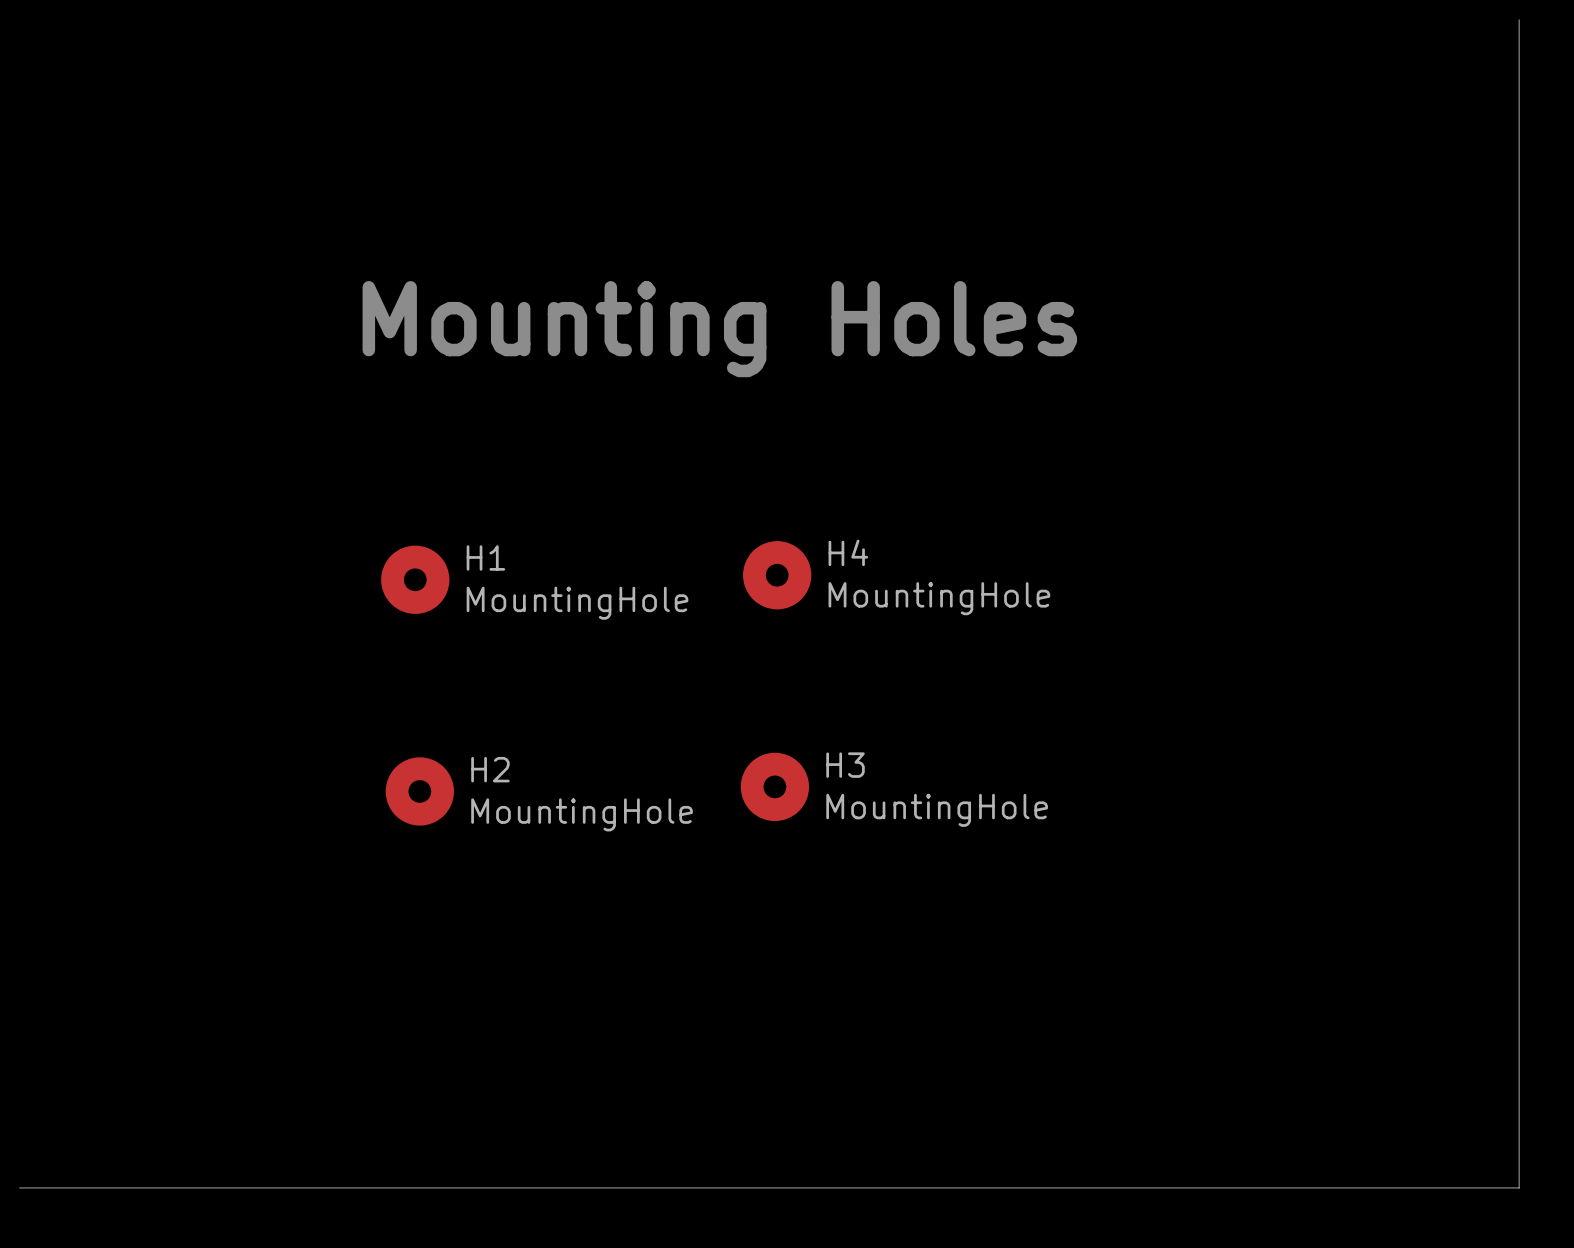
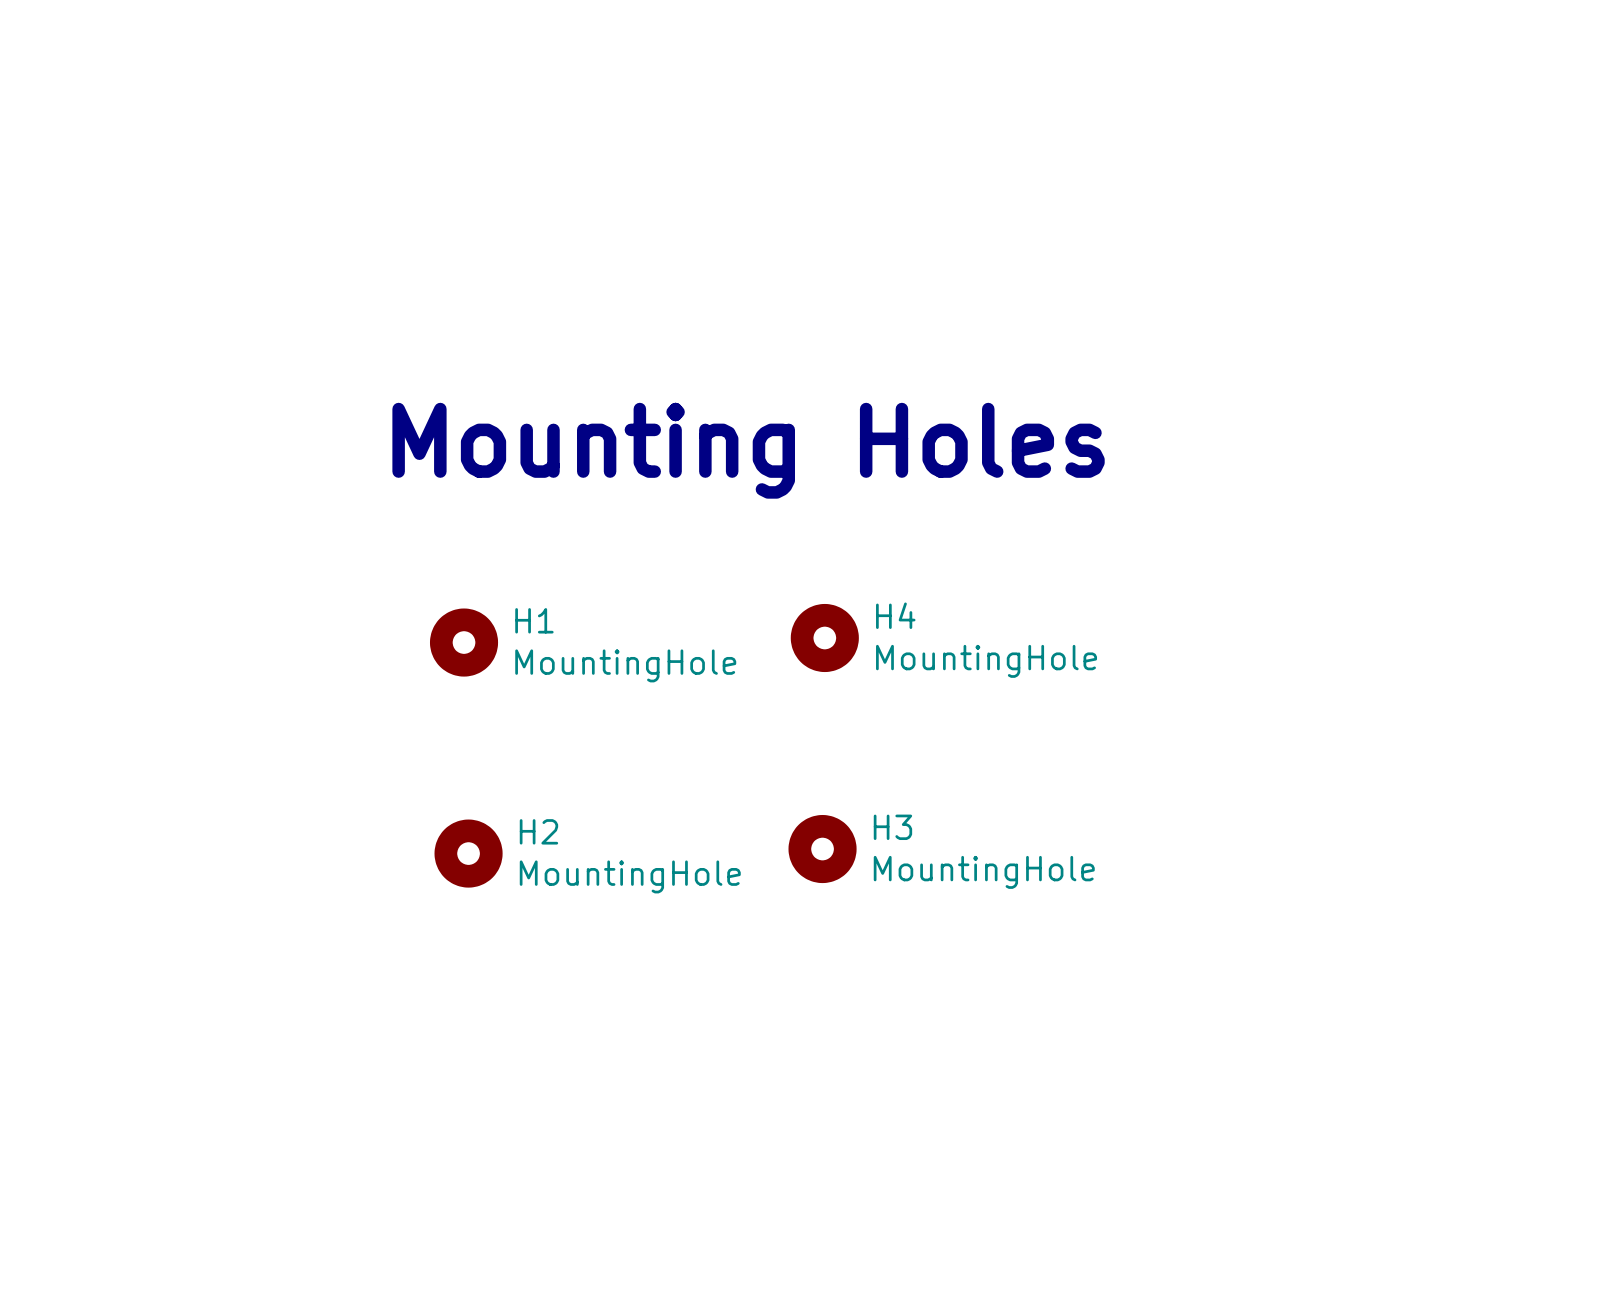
line: (1519, 19) (1519, 1187) (19, 1187) -> none
text position: Mounting Holes (719, 329) -> Mounting Holes (748, 450)

